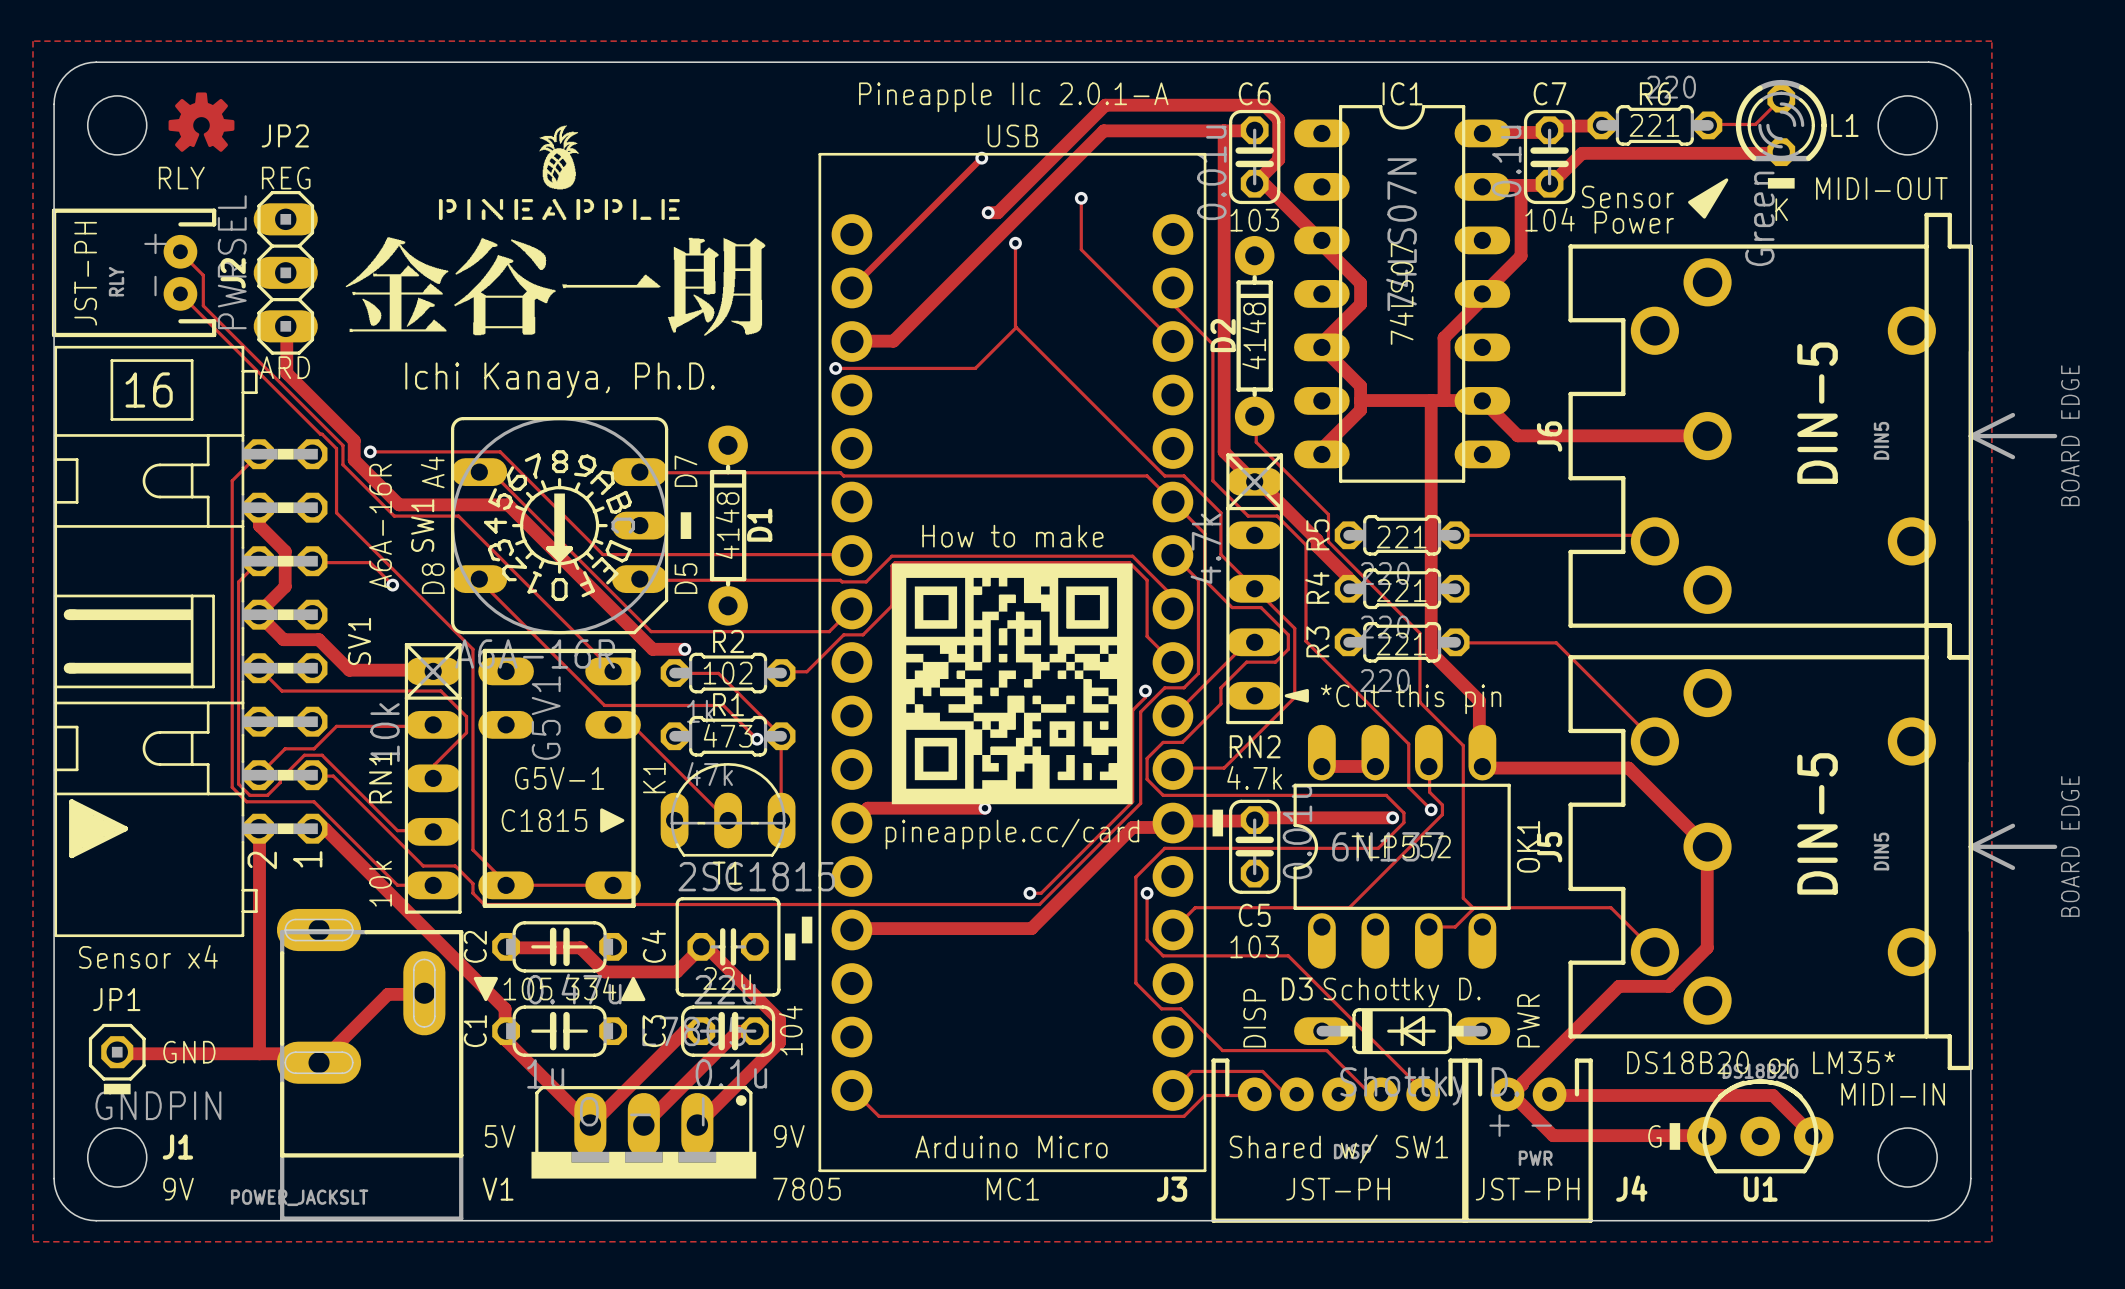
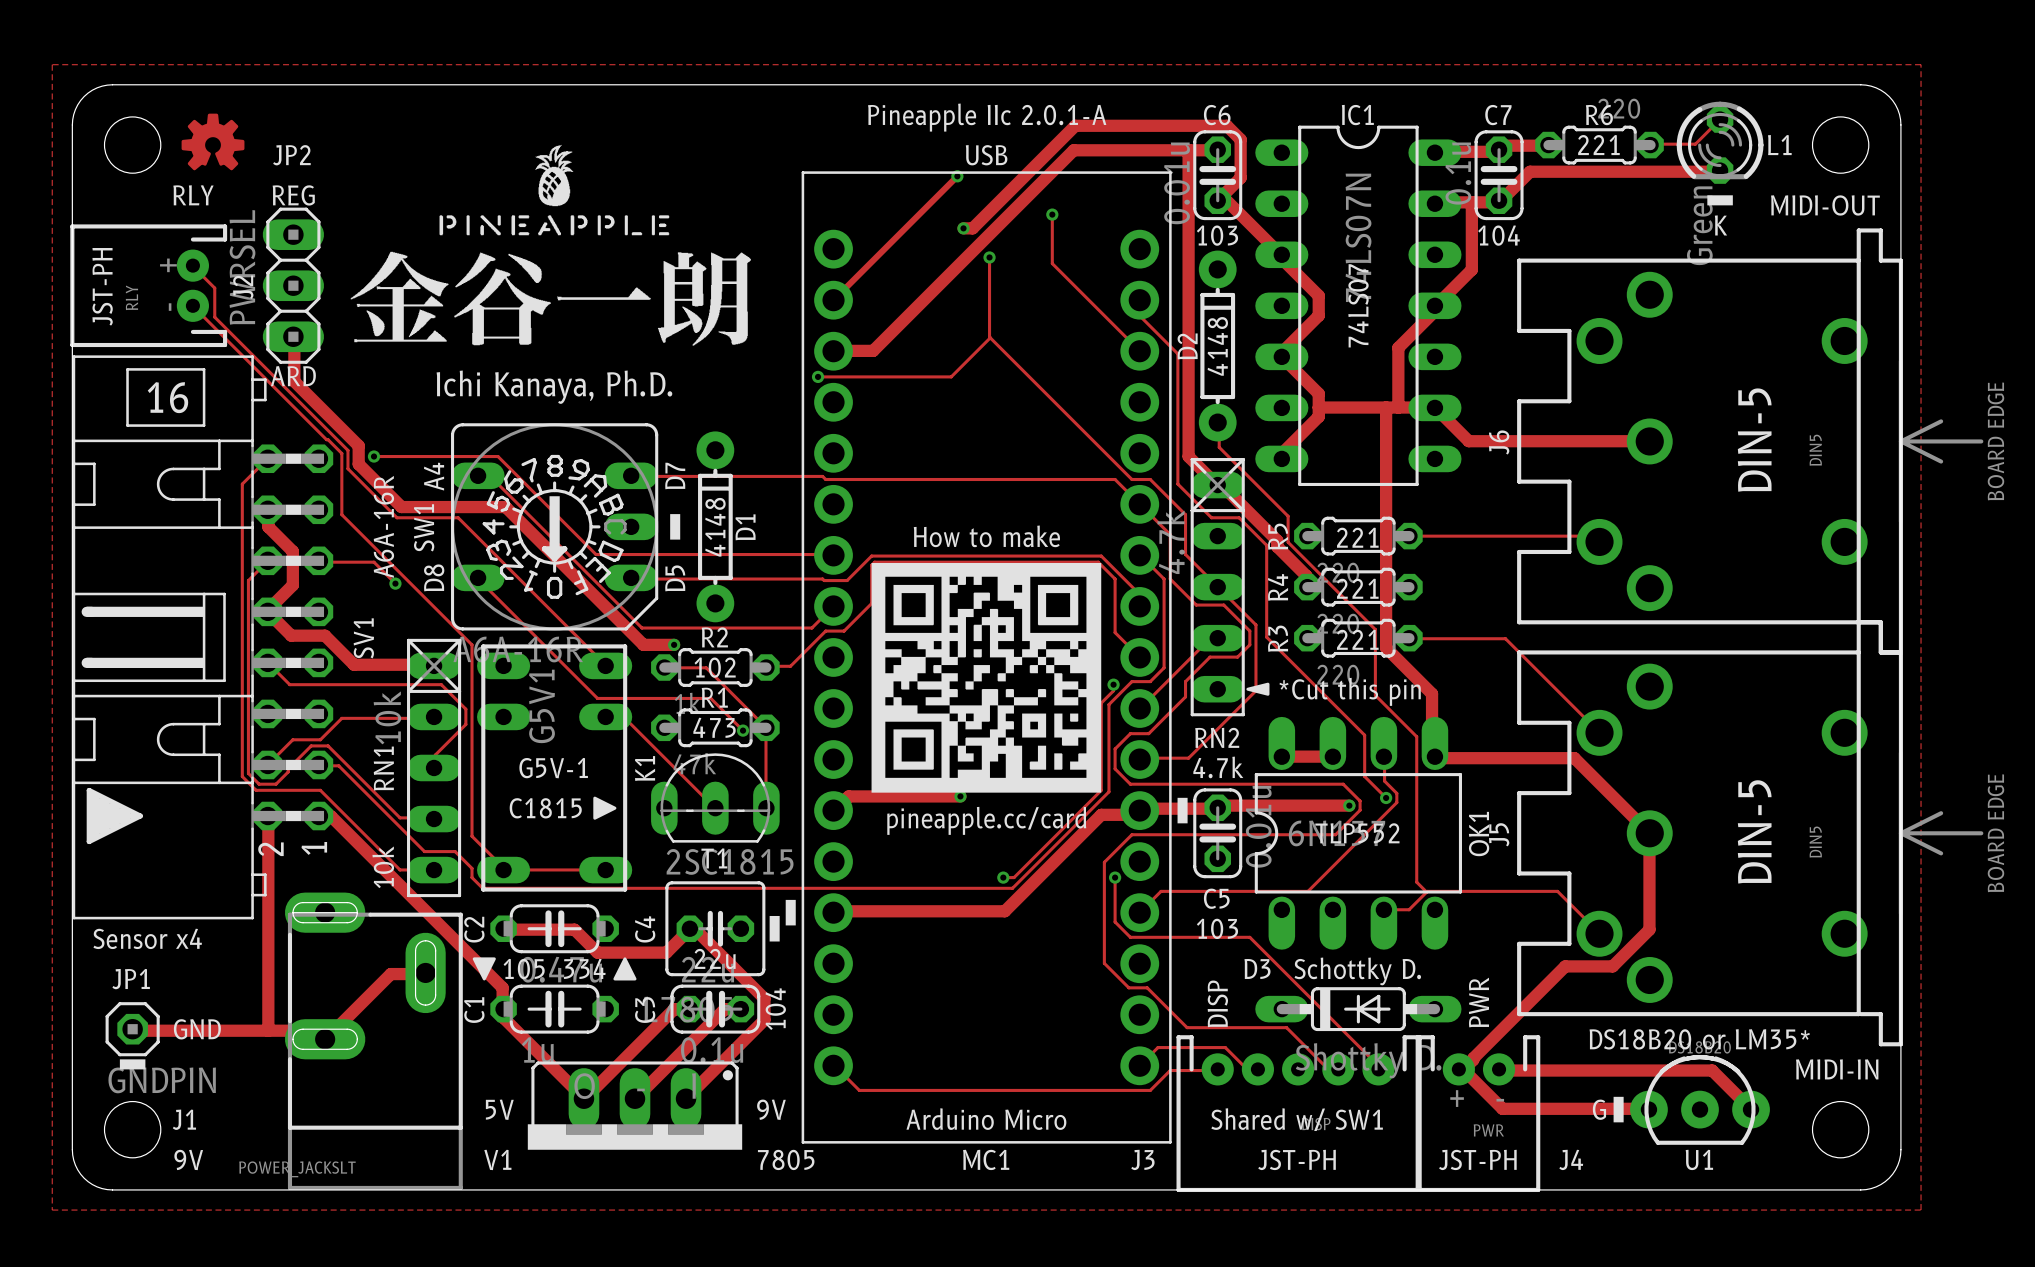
drawing: [1688, 178, 1729, 219] -> none
text: Sensor (1627, 197) -> none
text: Power (1634, 222) -> none

